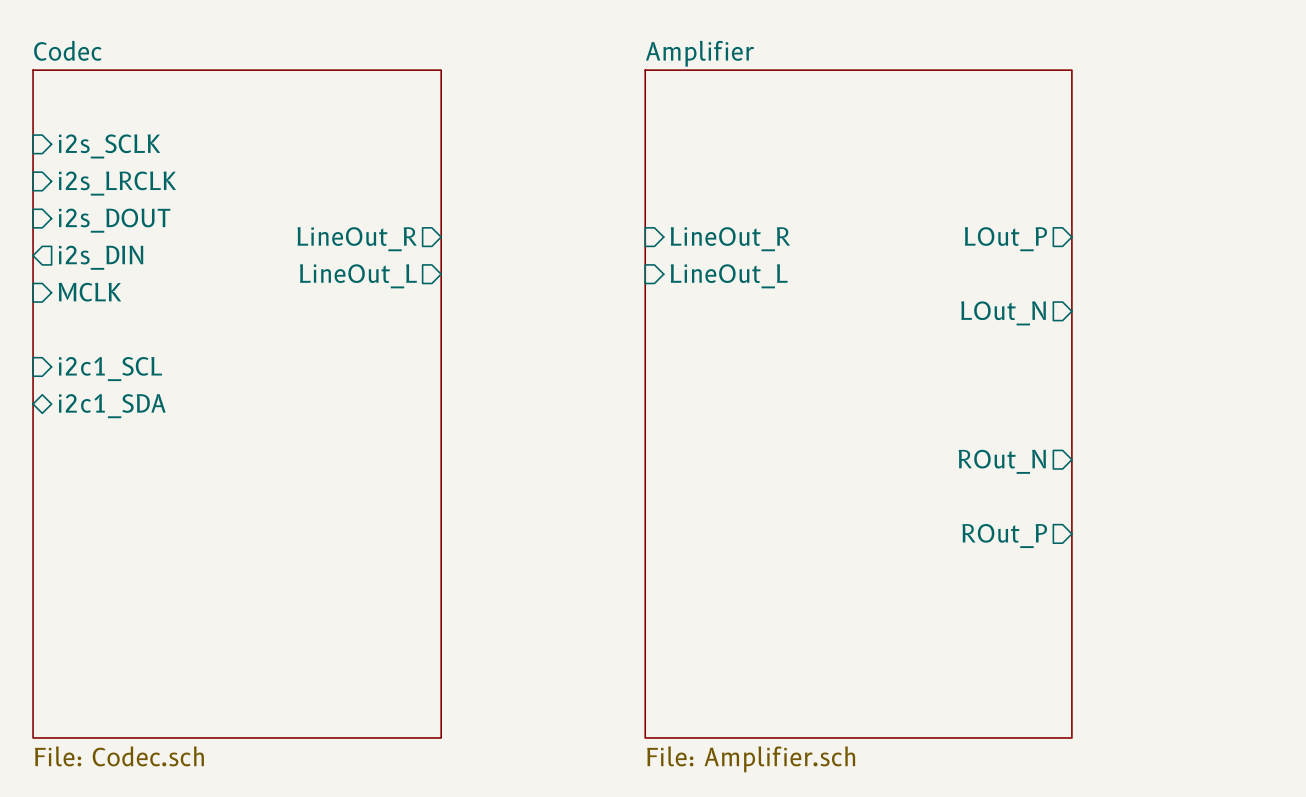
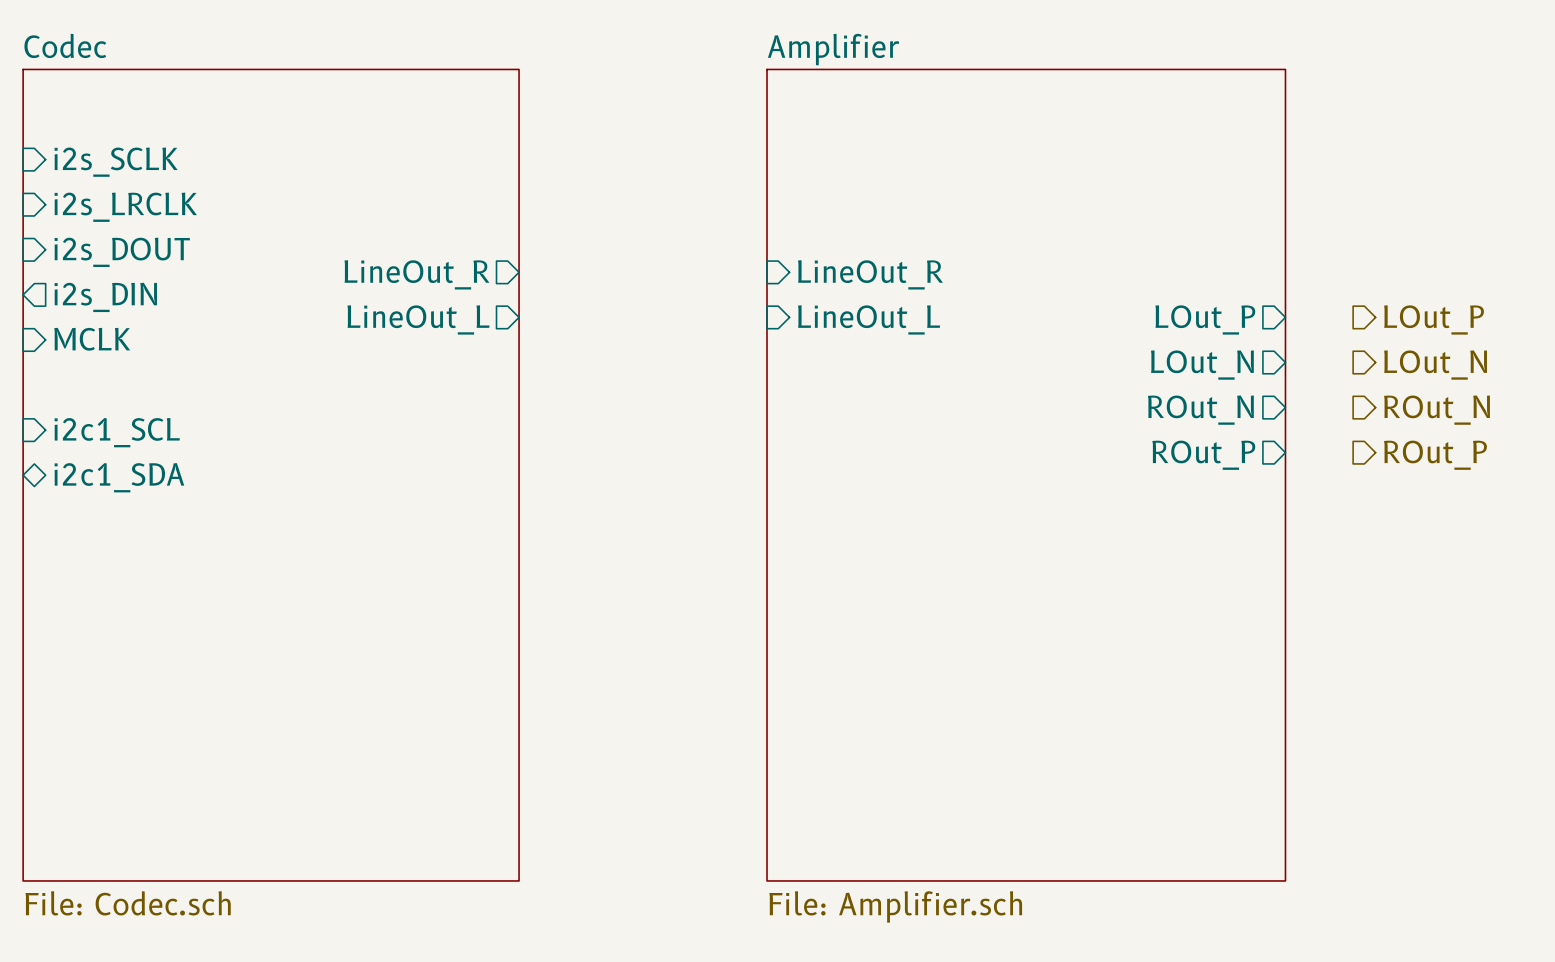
sheet pin position: LOut_P (1005, 239) -> LOut_P (1205, 319)
hierarchical label: none -> LOut_P (1434, 319)
hierarchical label: none -> LOut_N (1435, 365)
hierarchical label: none -> ROut_N (1436, 410)
hierarchical label: none -> ROut_P (1435, 455)
sheet pin position: ROut_N (1002, 461) -> ROut_N (1200, 410)
sheet pin position: ROut_P (1004, 536) -> ROut_P (1203, 455)

